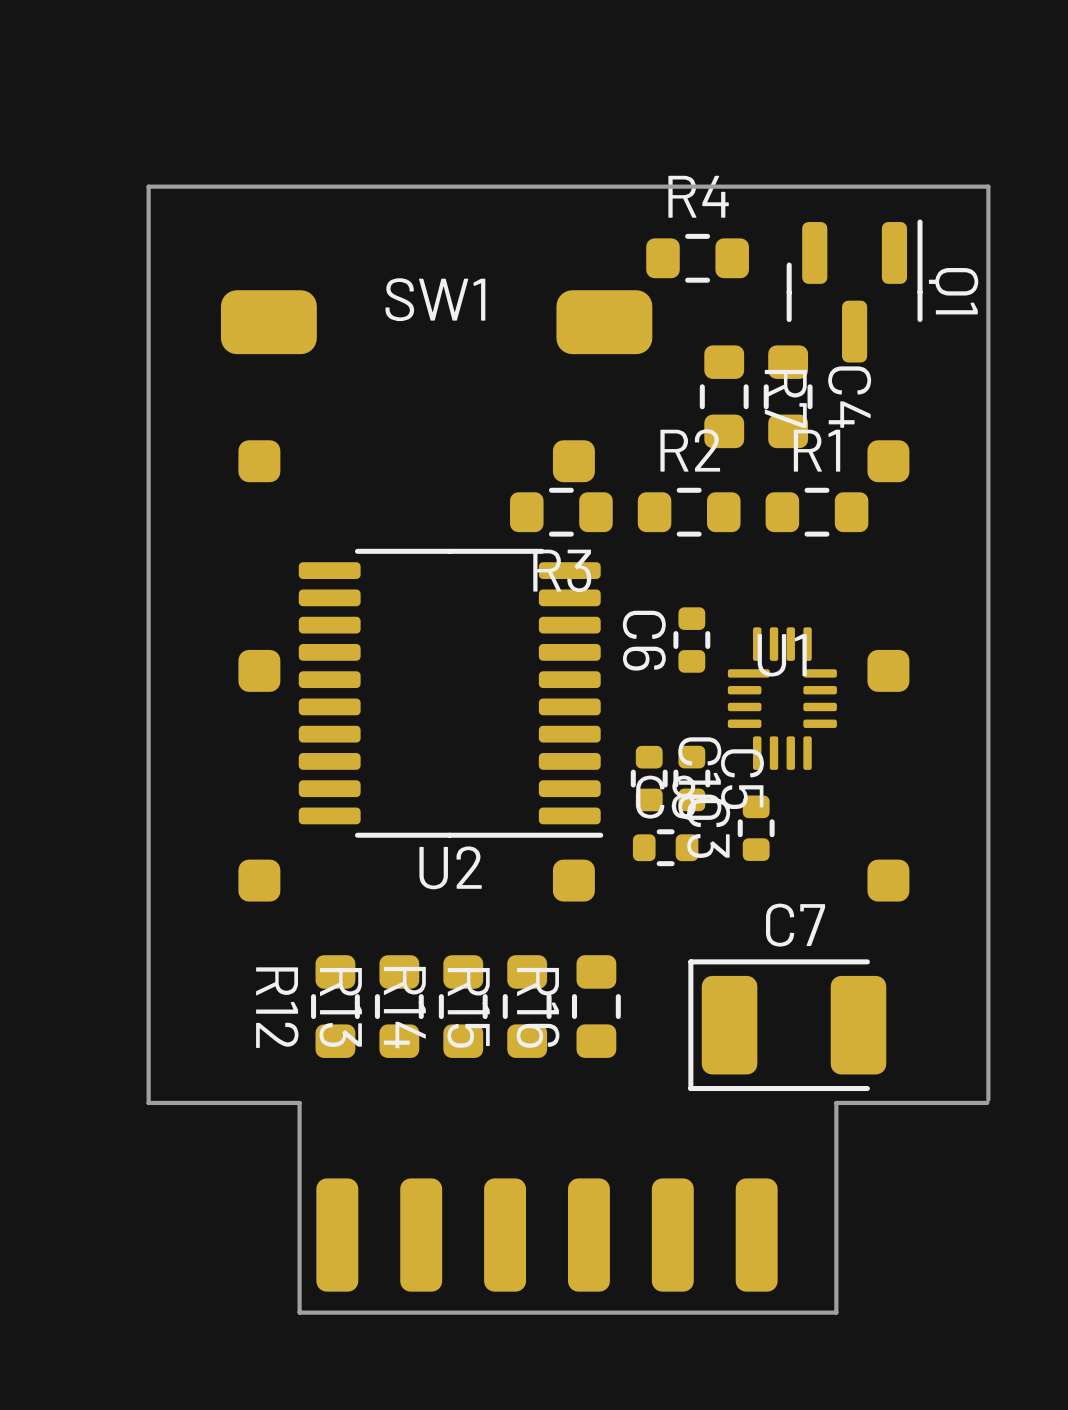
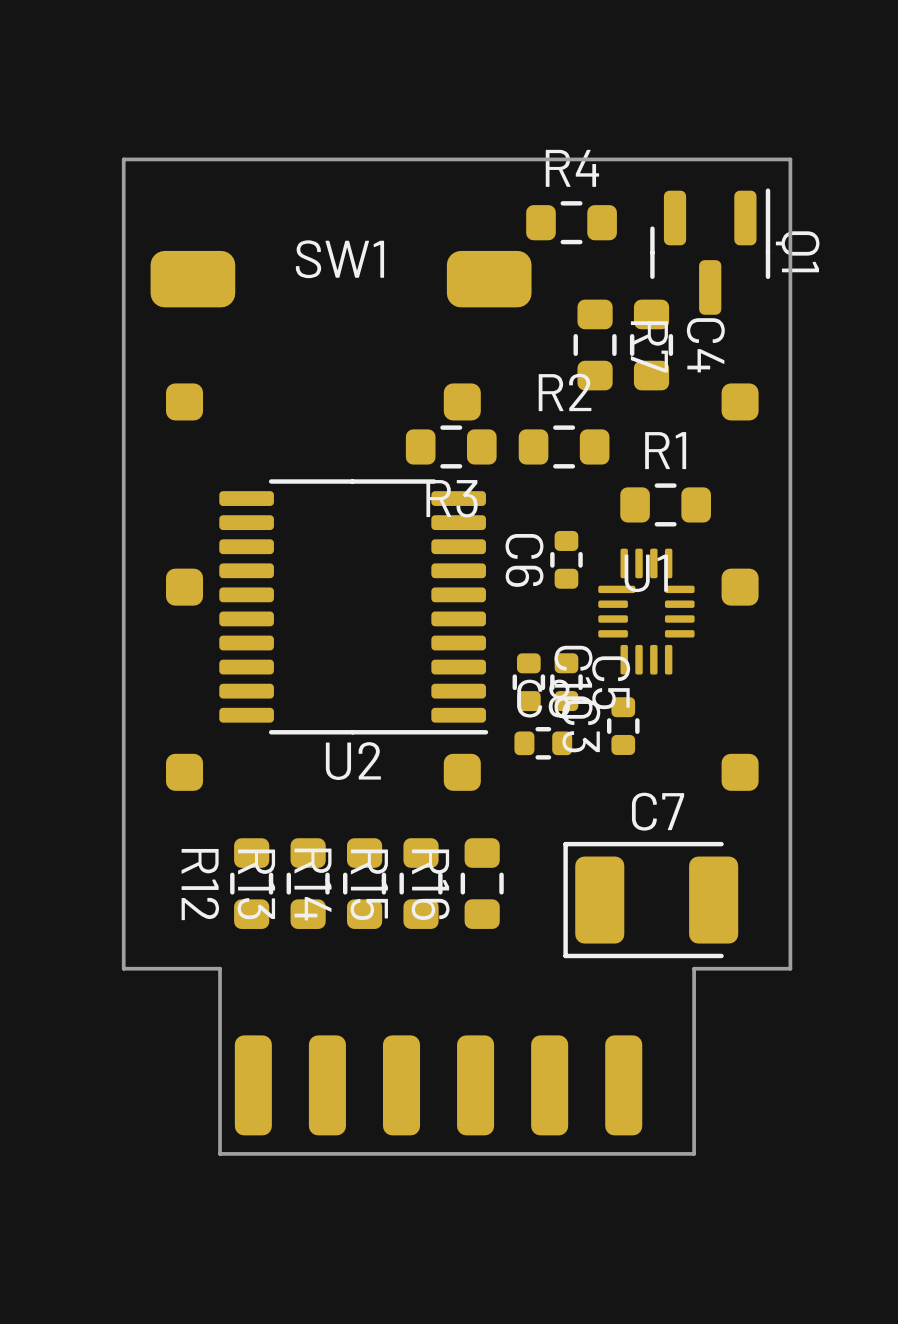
board edge: (190, 186) (148, 186) (148, 1102) (190, 1102) -> (123, 159) (123, 968)
board edge: (945, 186) (988, 186) (988, 1099) -> (790, 159) (790, 968)
R1 position: (816, 512) -> (665, 504)
board edge: (987, 1102) (945, 1102) -> none

